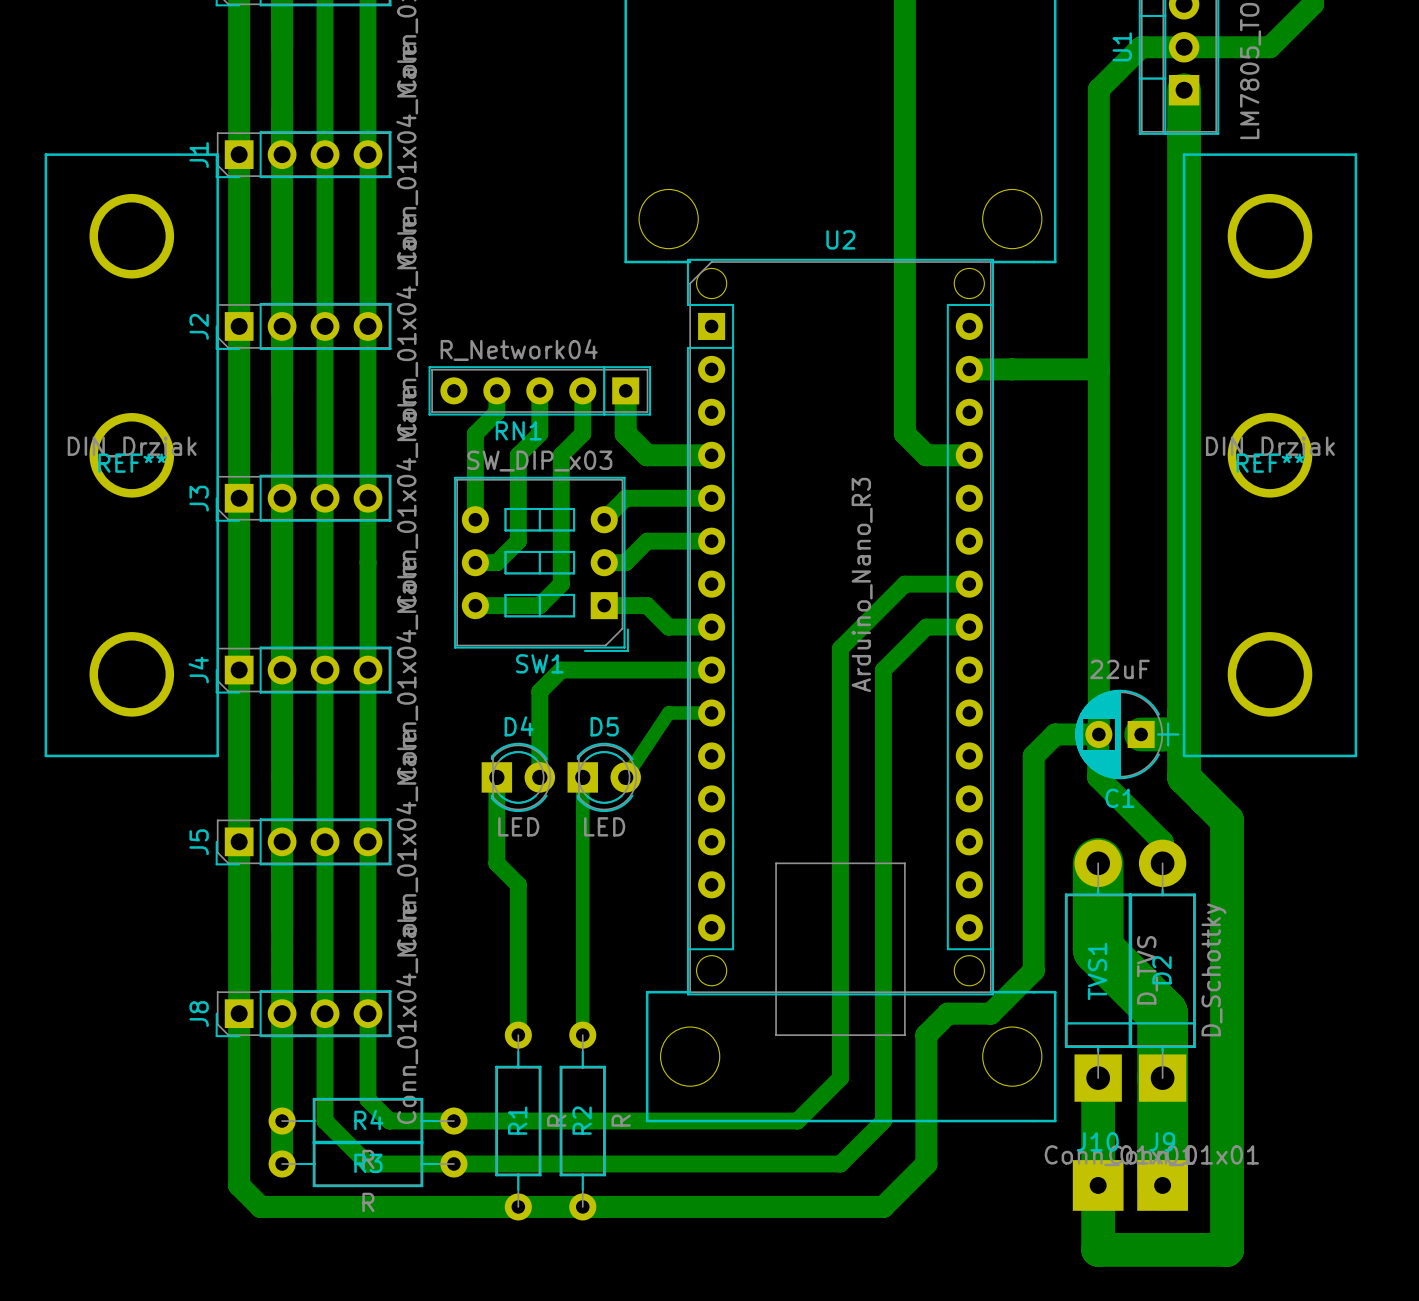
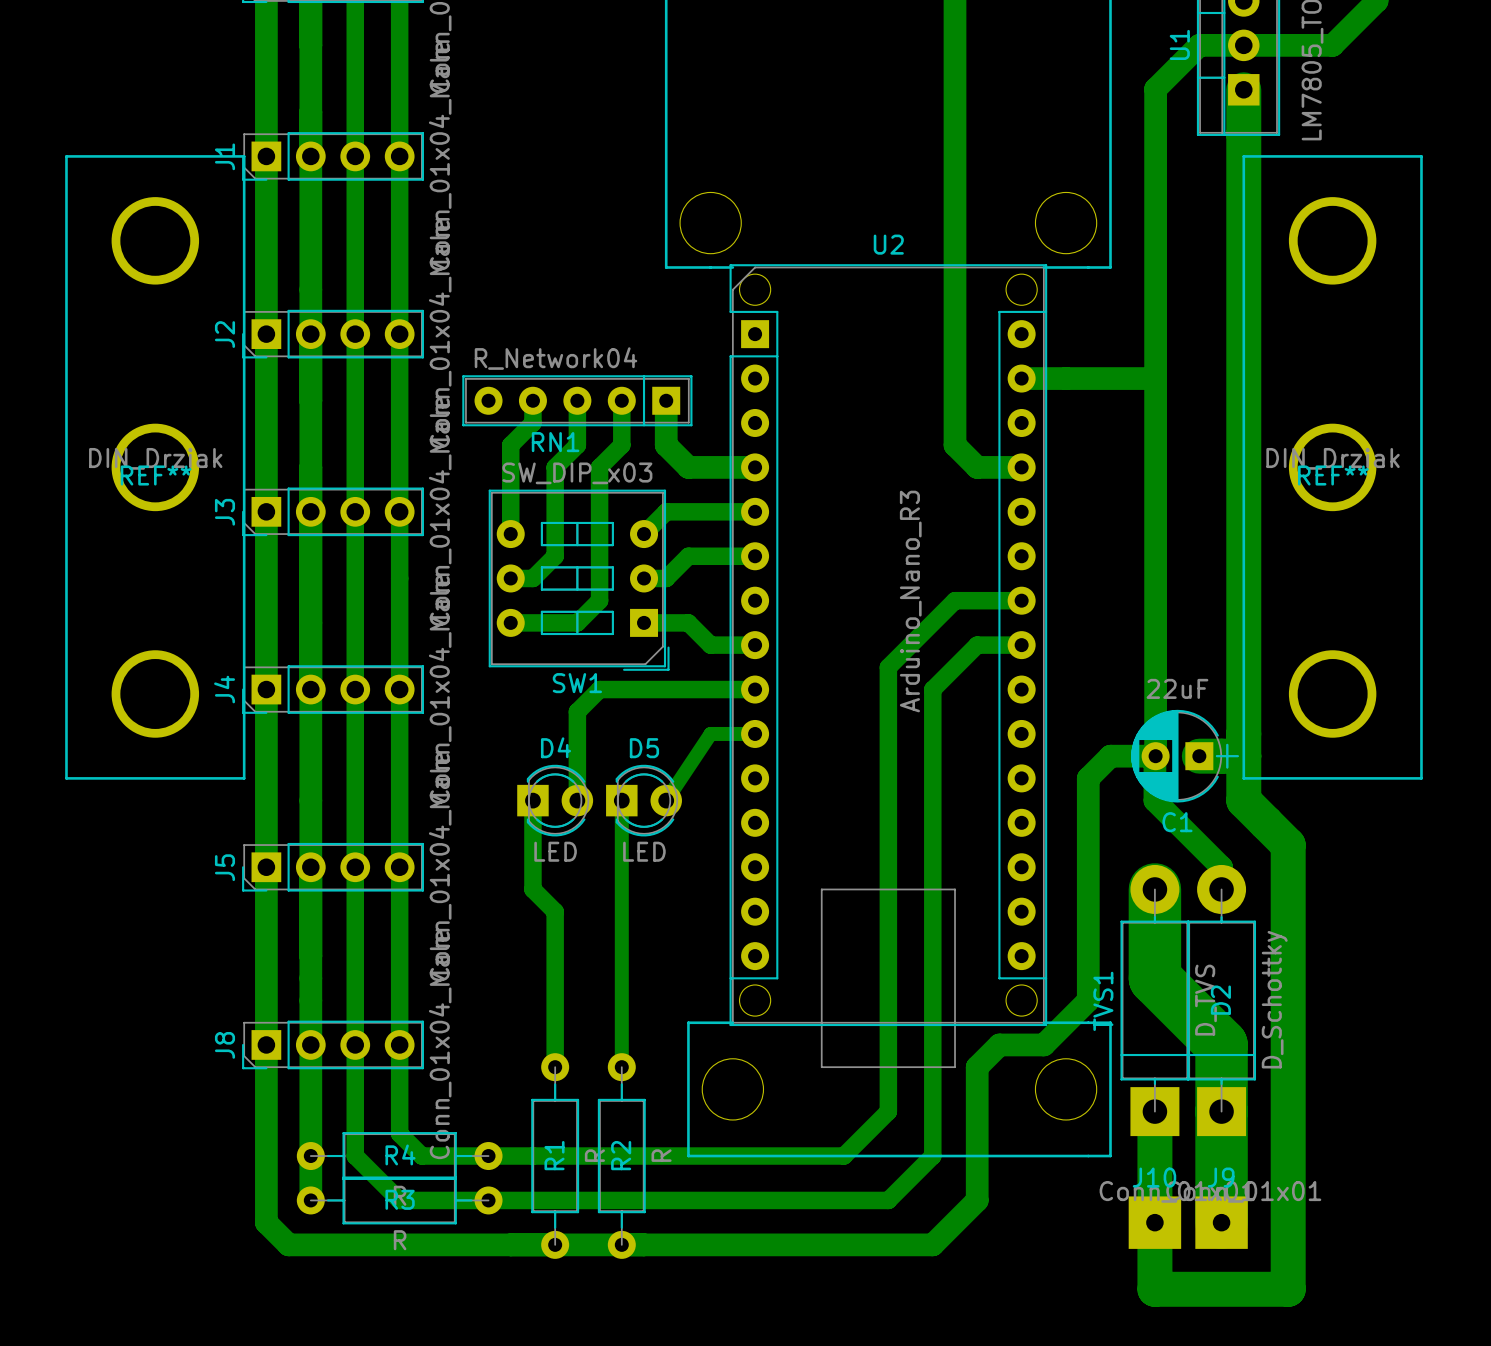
TVS1 name position: TVS1 (1097, 971) -> TVS1 (1103, 1001)

